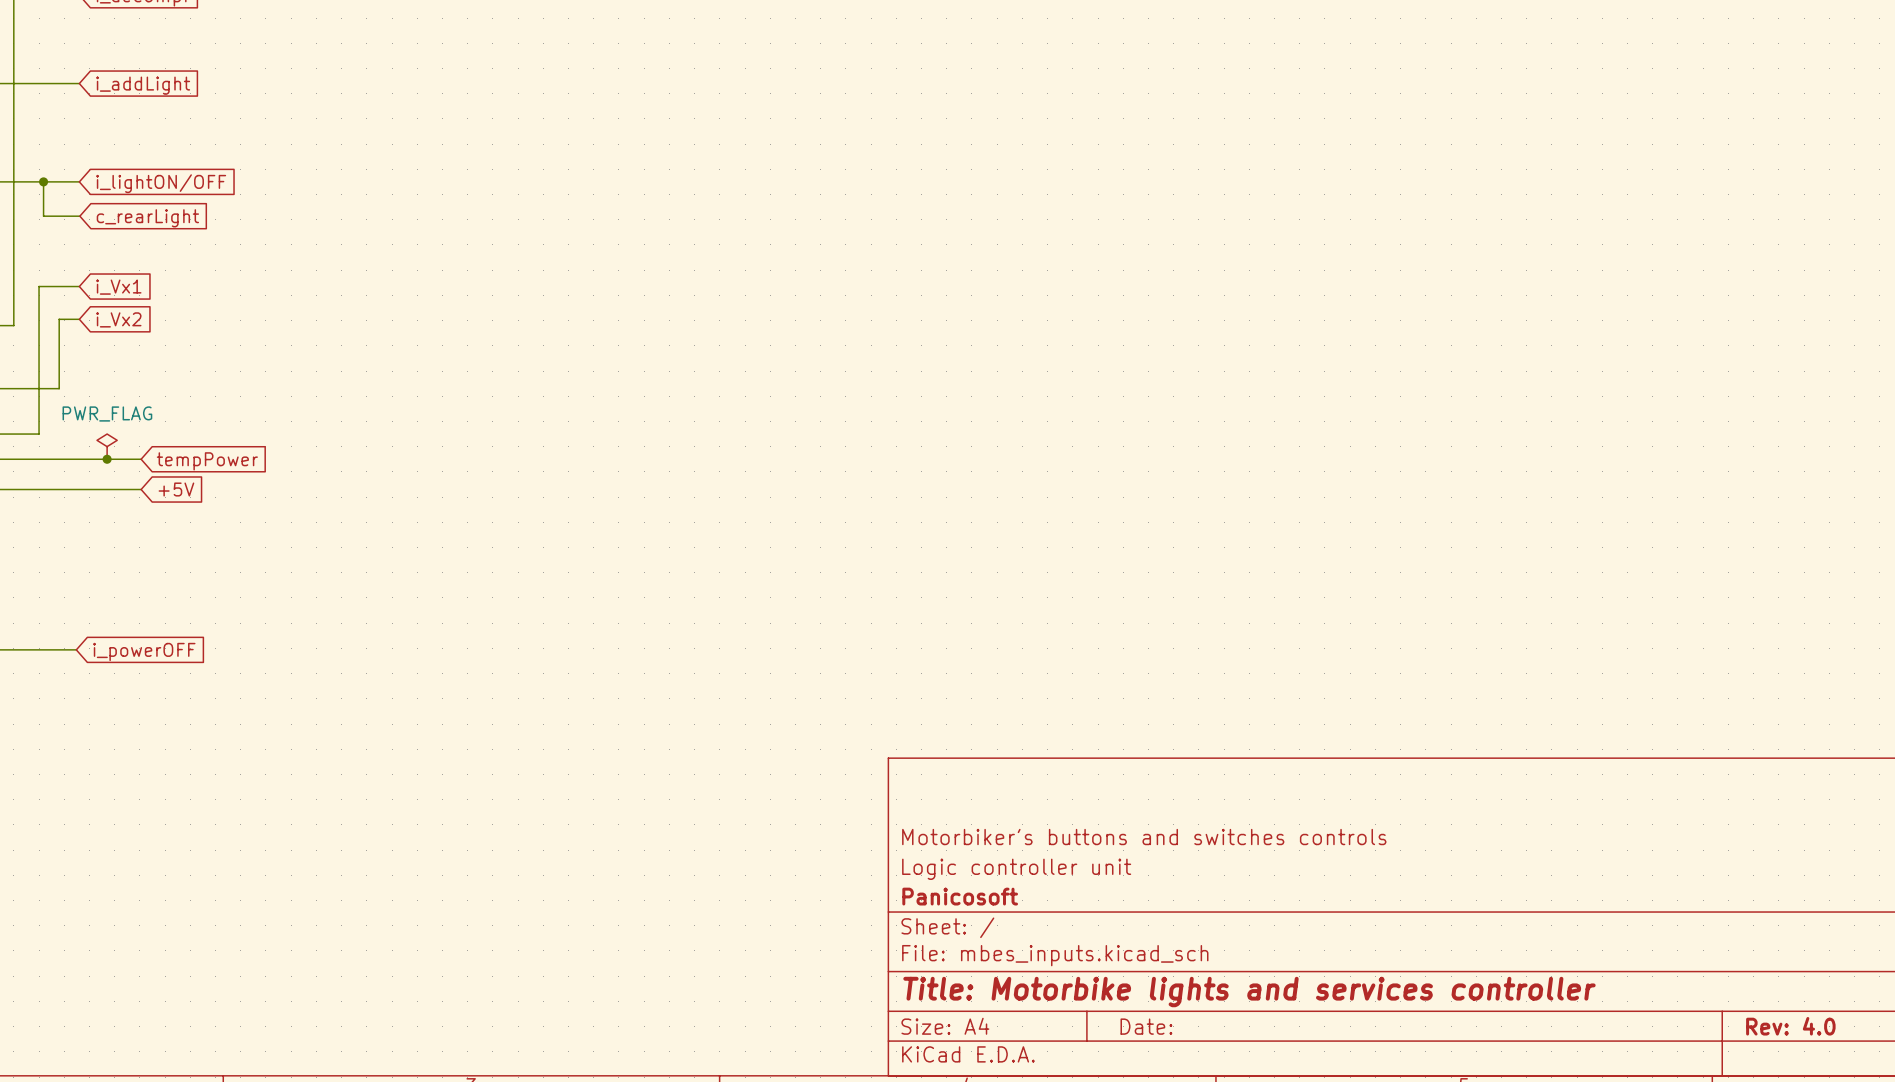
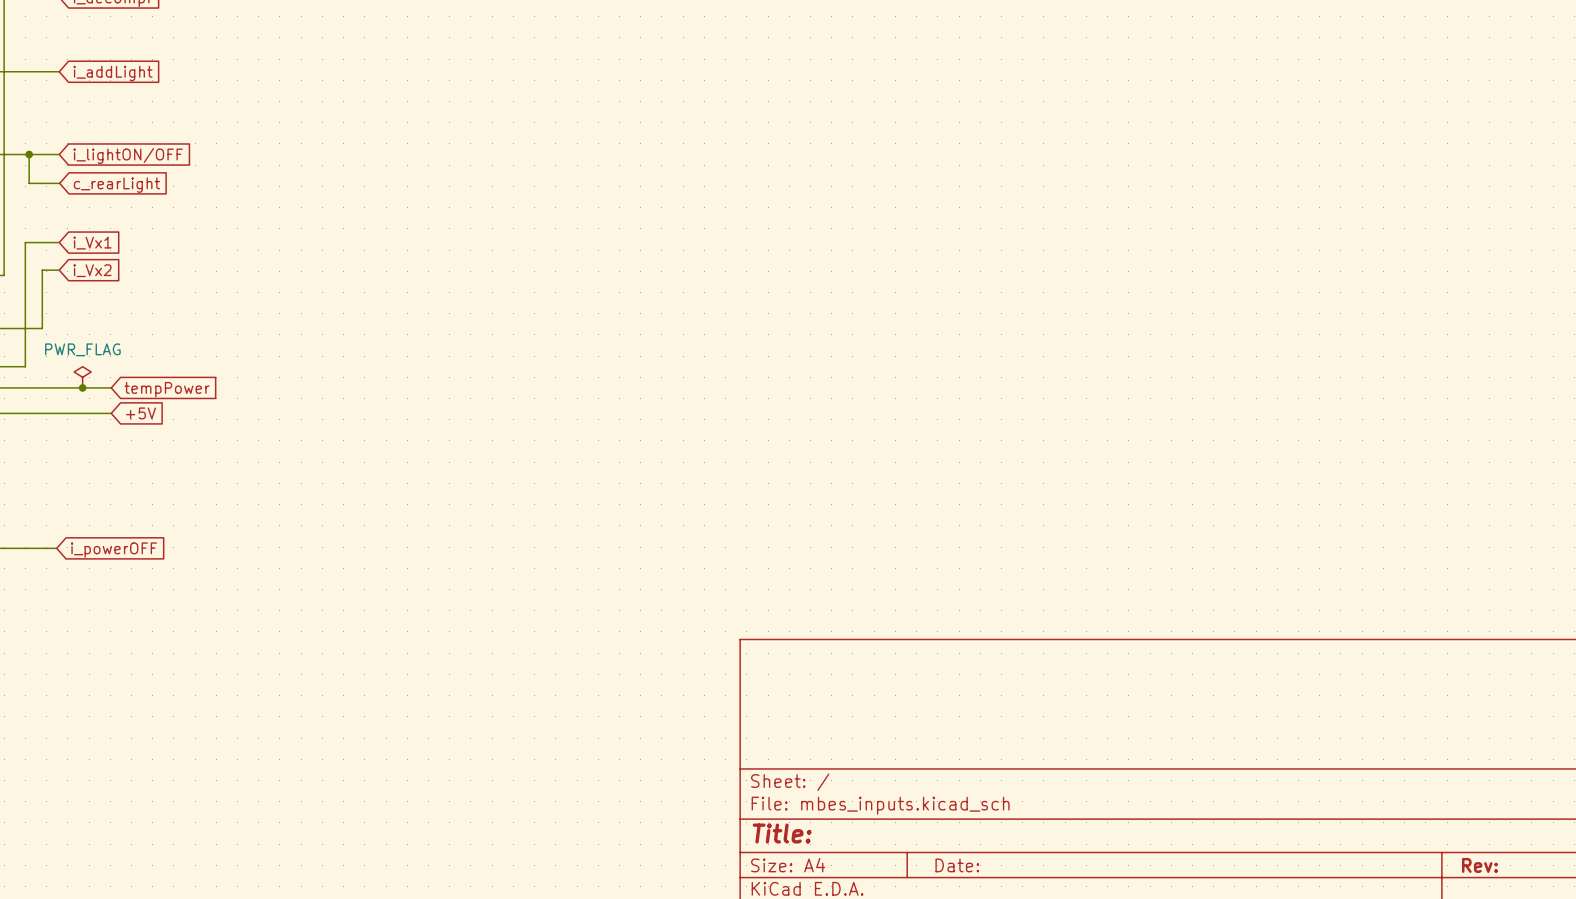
title block: Motorbiker's buttons and switches controls (1144, 837) -> none
title block: Logic controller unit (1016, 869) -> none
title block: Panicosoft (960, 896) -> none
title block: Title: Motorbike lights and services controller (1249, 992) -> Title: (782, 833)
title block: Rev: 4.0 (1790, 1026) -> Rev: (1479, 865)

